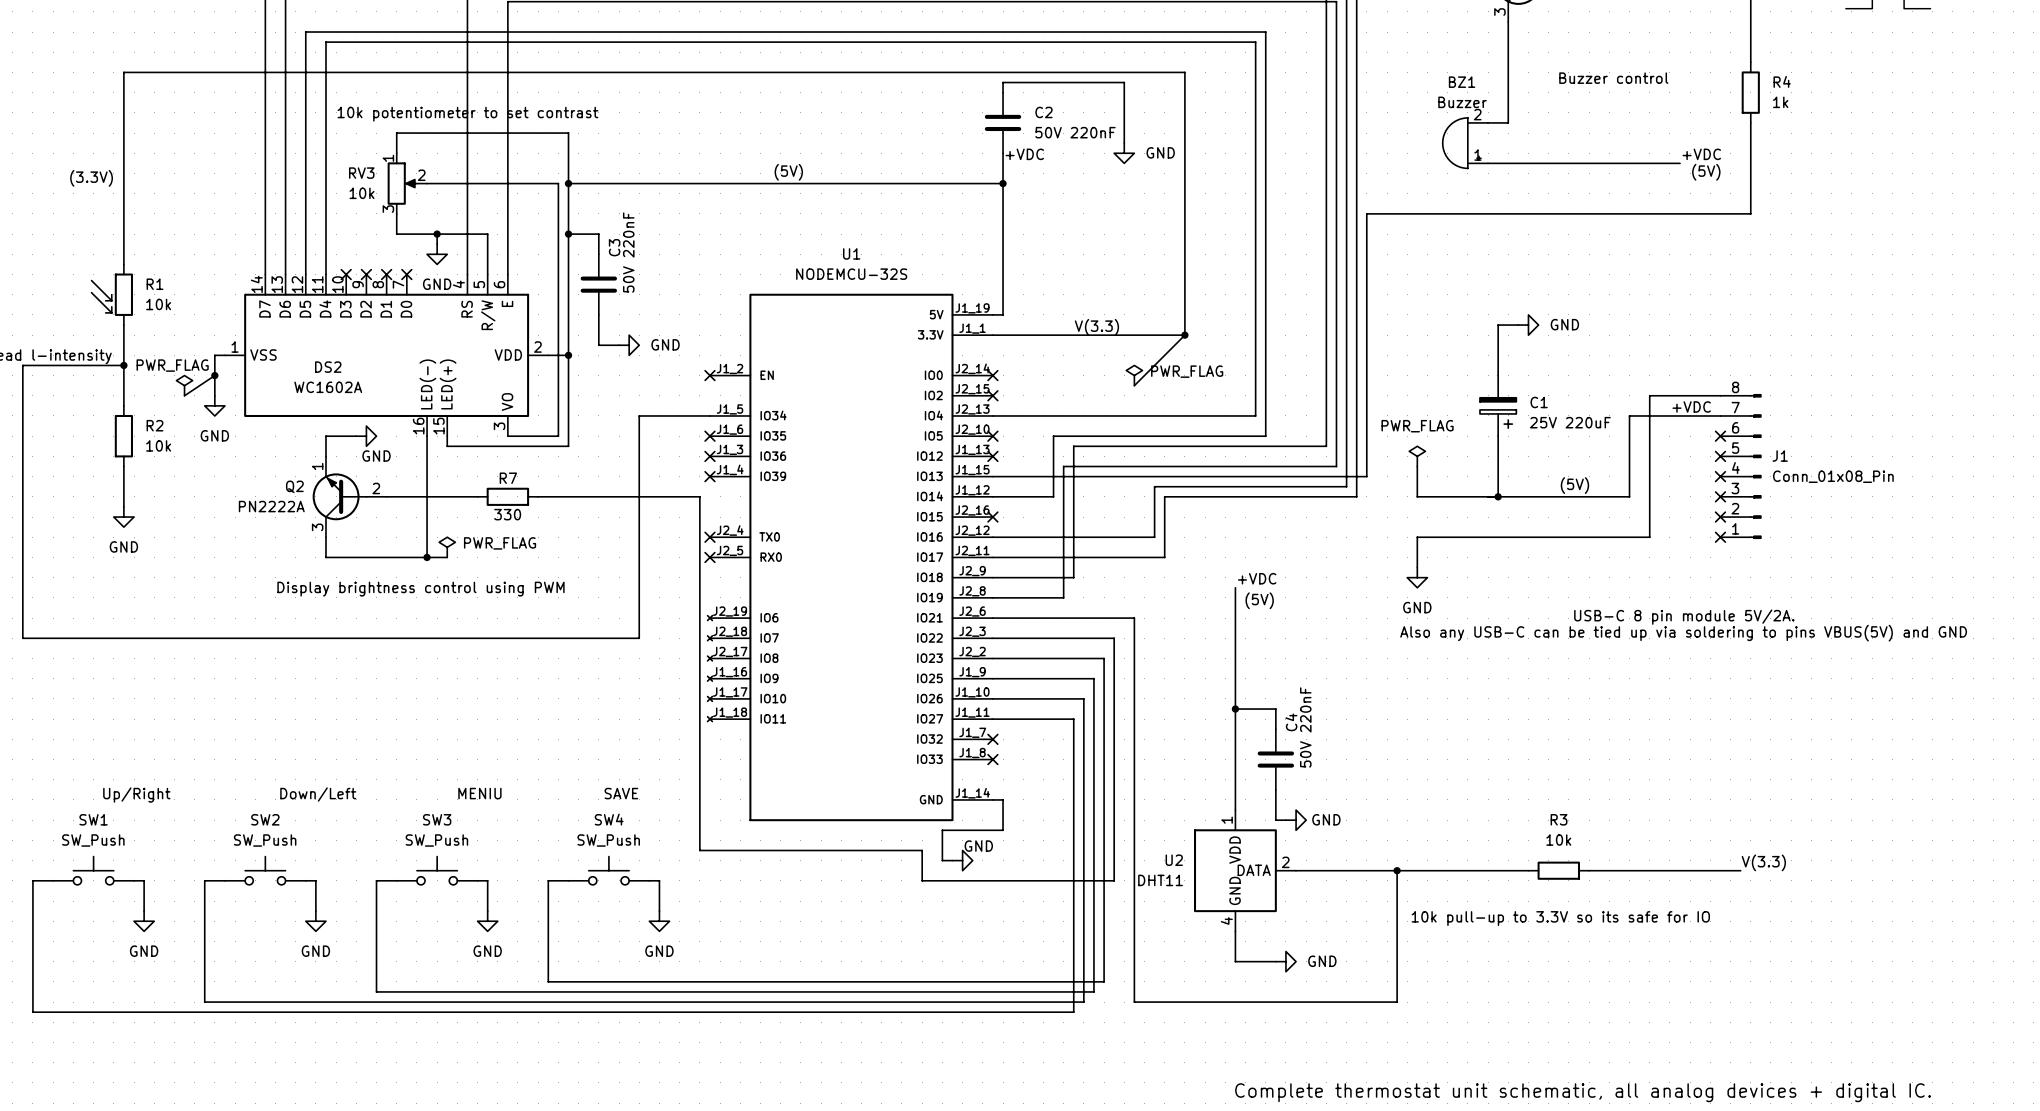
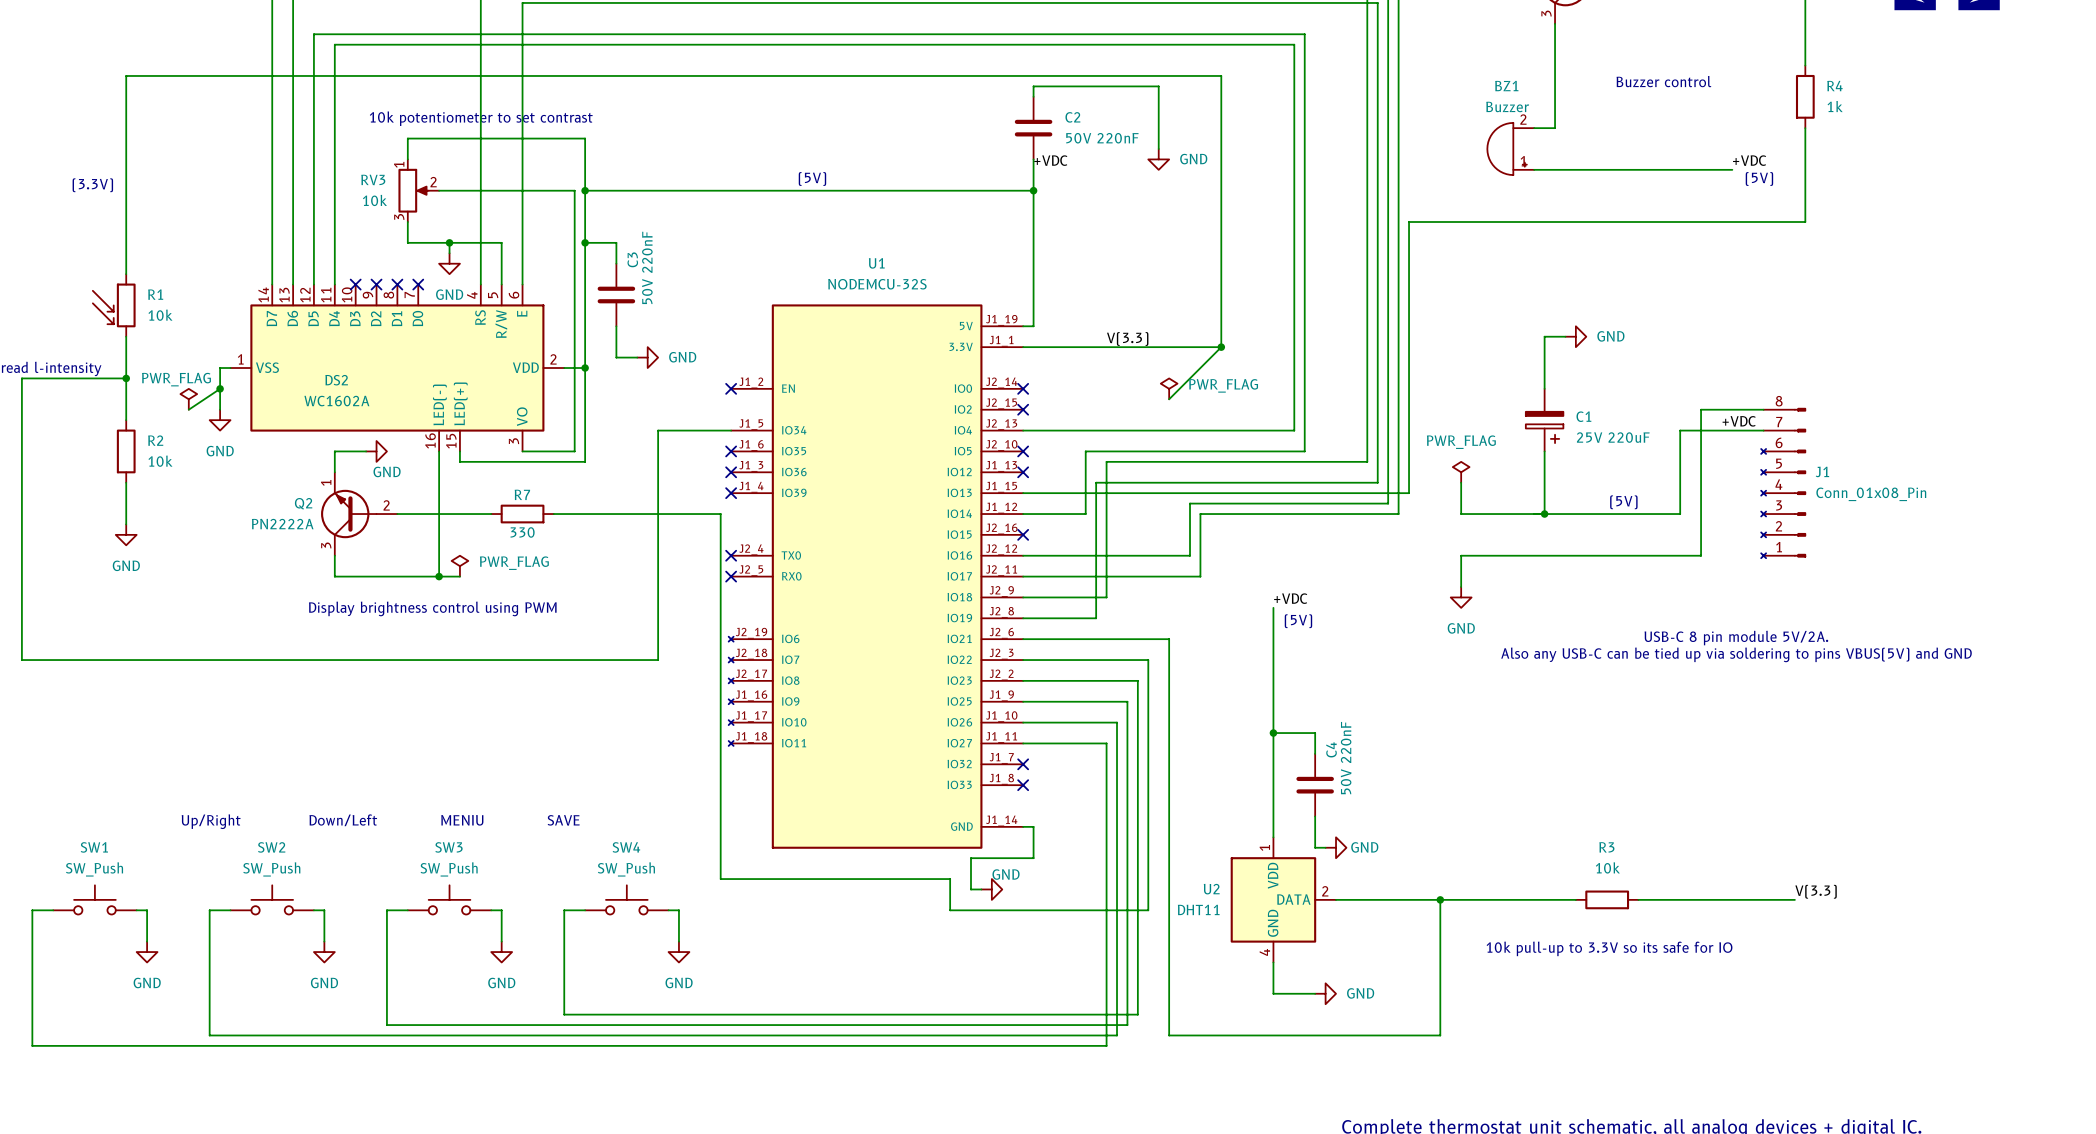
J1 symbol: [1720, 394, 1762, 539] -> [1761, 408, 1806, 559]
no-connect mark: (1720, 436) -> none
no-connect mark: (1720, 456) -> none
no-connect mark: (1720, 476) -> none
no-connect mark: (1720, 496) -> none
no-connect mark: (1720, 517) -> none
no-connect mark: (1720, 537) -> none

